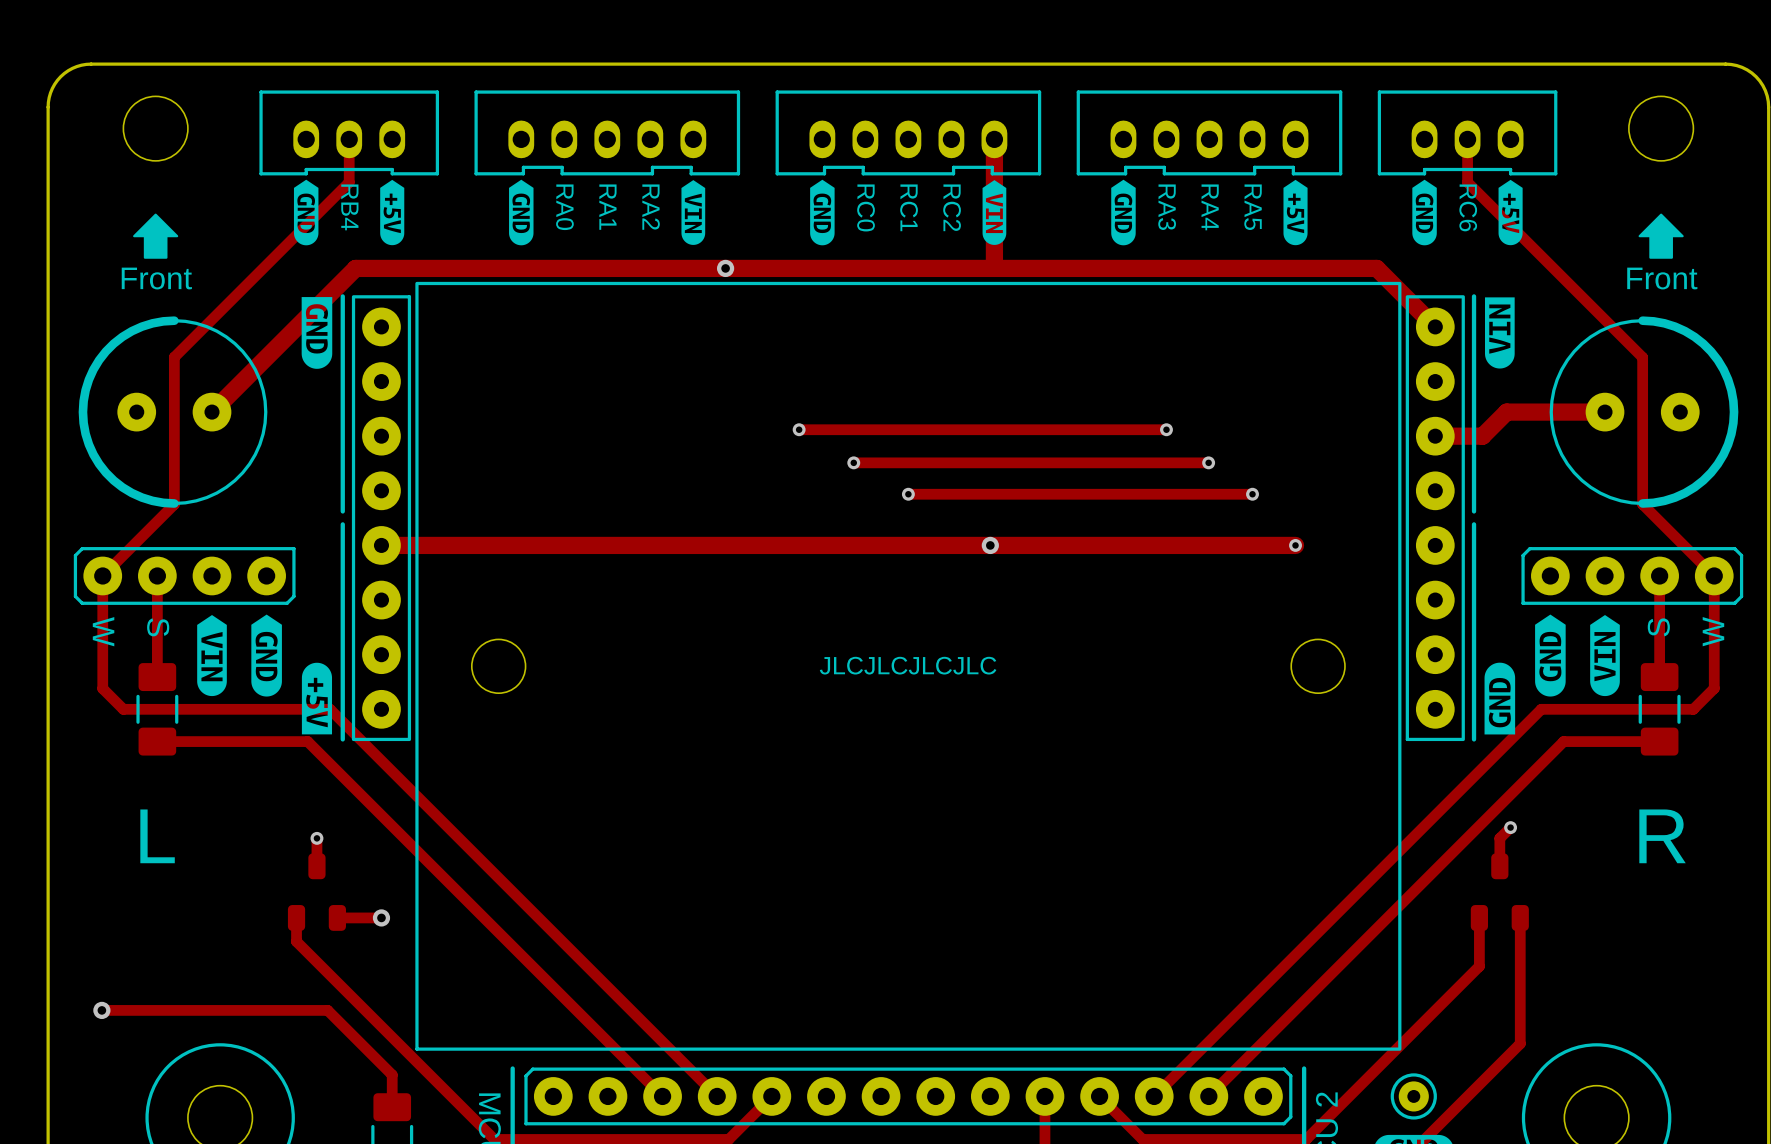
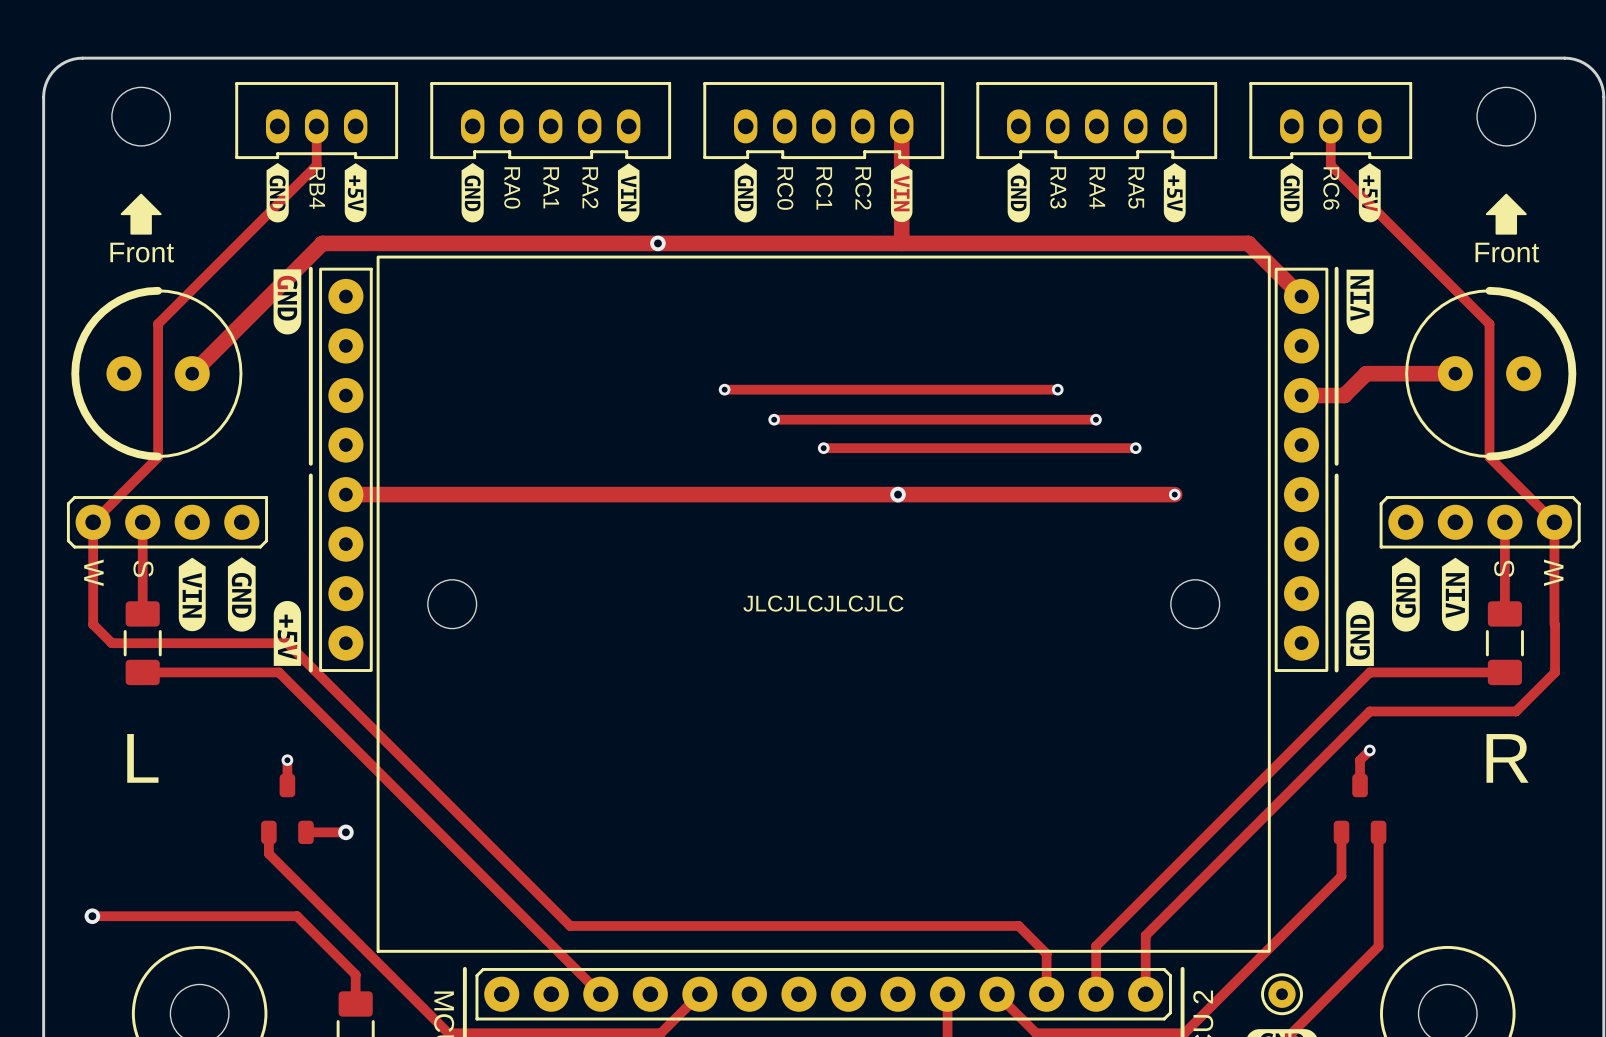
track: (1714, 688) (1693, 709) (1541, 709) (1154, 1096) -> (1554, 624) (1555, 672) (1516, 711) (1369, 711) (1145, 935) (1145, 994)
track: (316, 709) (330, 709) (717, 1096) -> (287, 643) (570, 925) (1018, 925) (1046, 953) (1046, 994)
track: (1563, 741) (1208, 1096) -> (1417, 672) (1369, 672) (1096, 946) (1096, 994)

